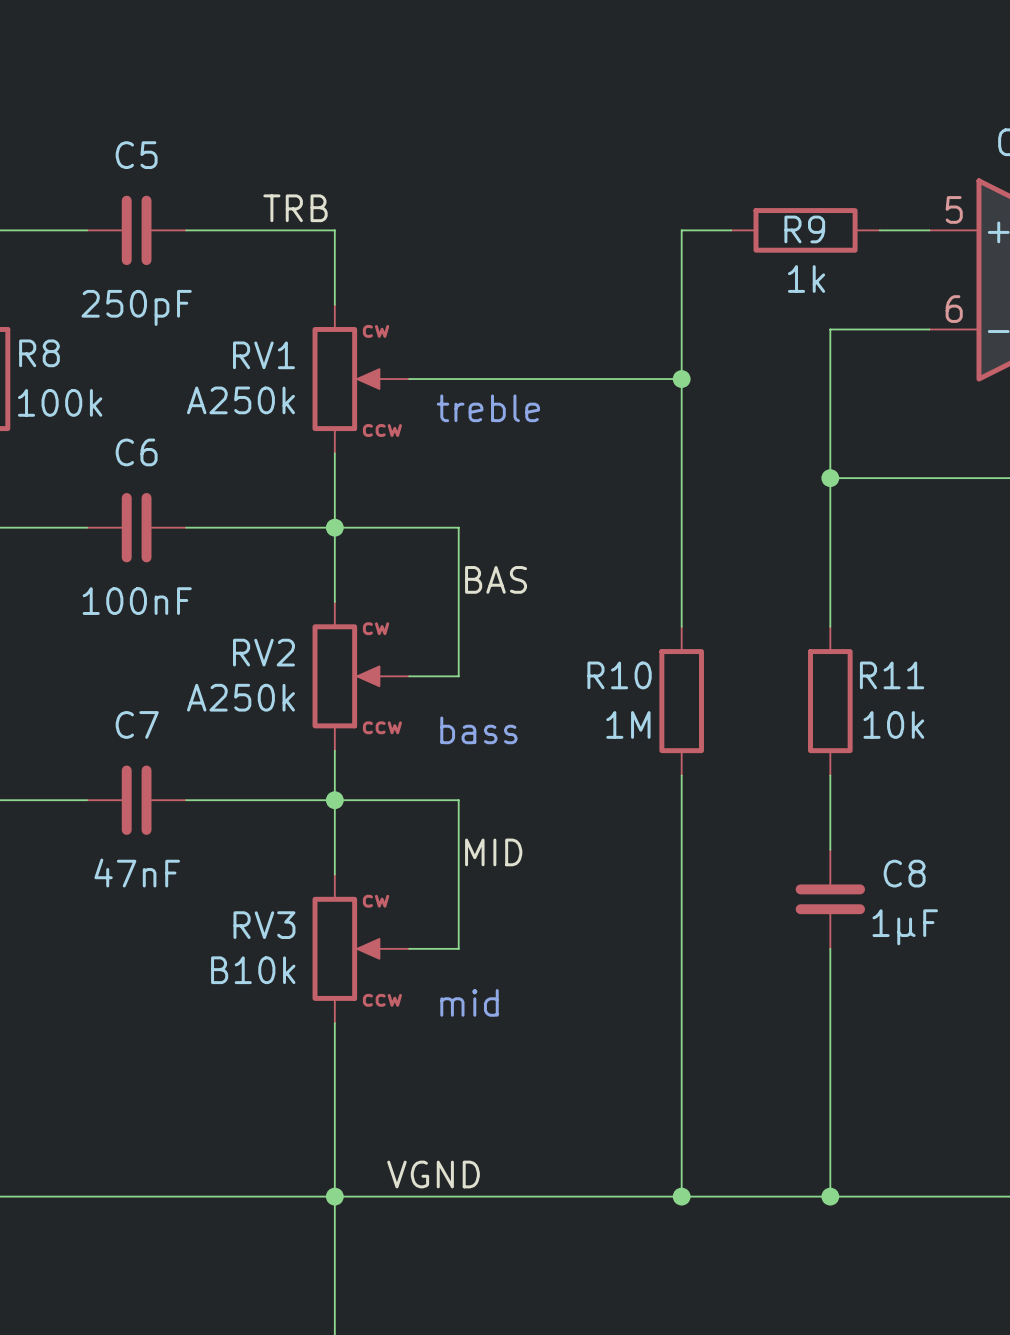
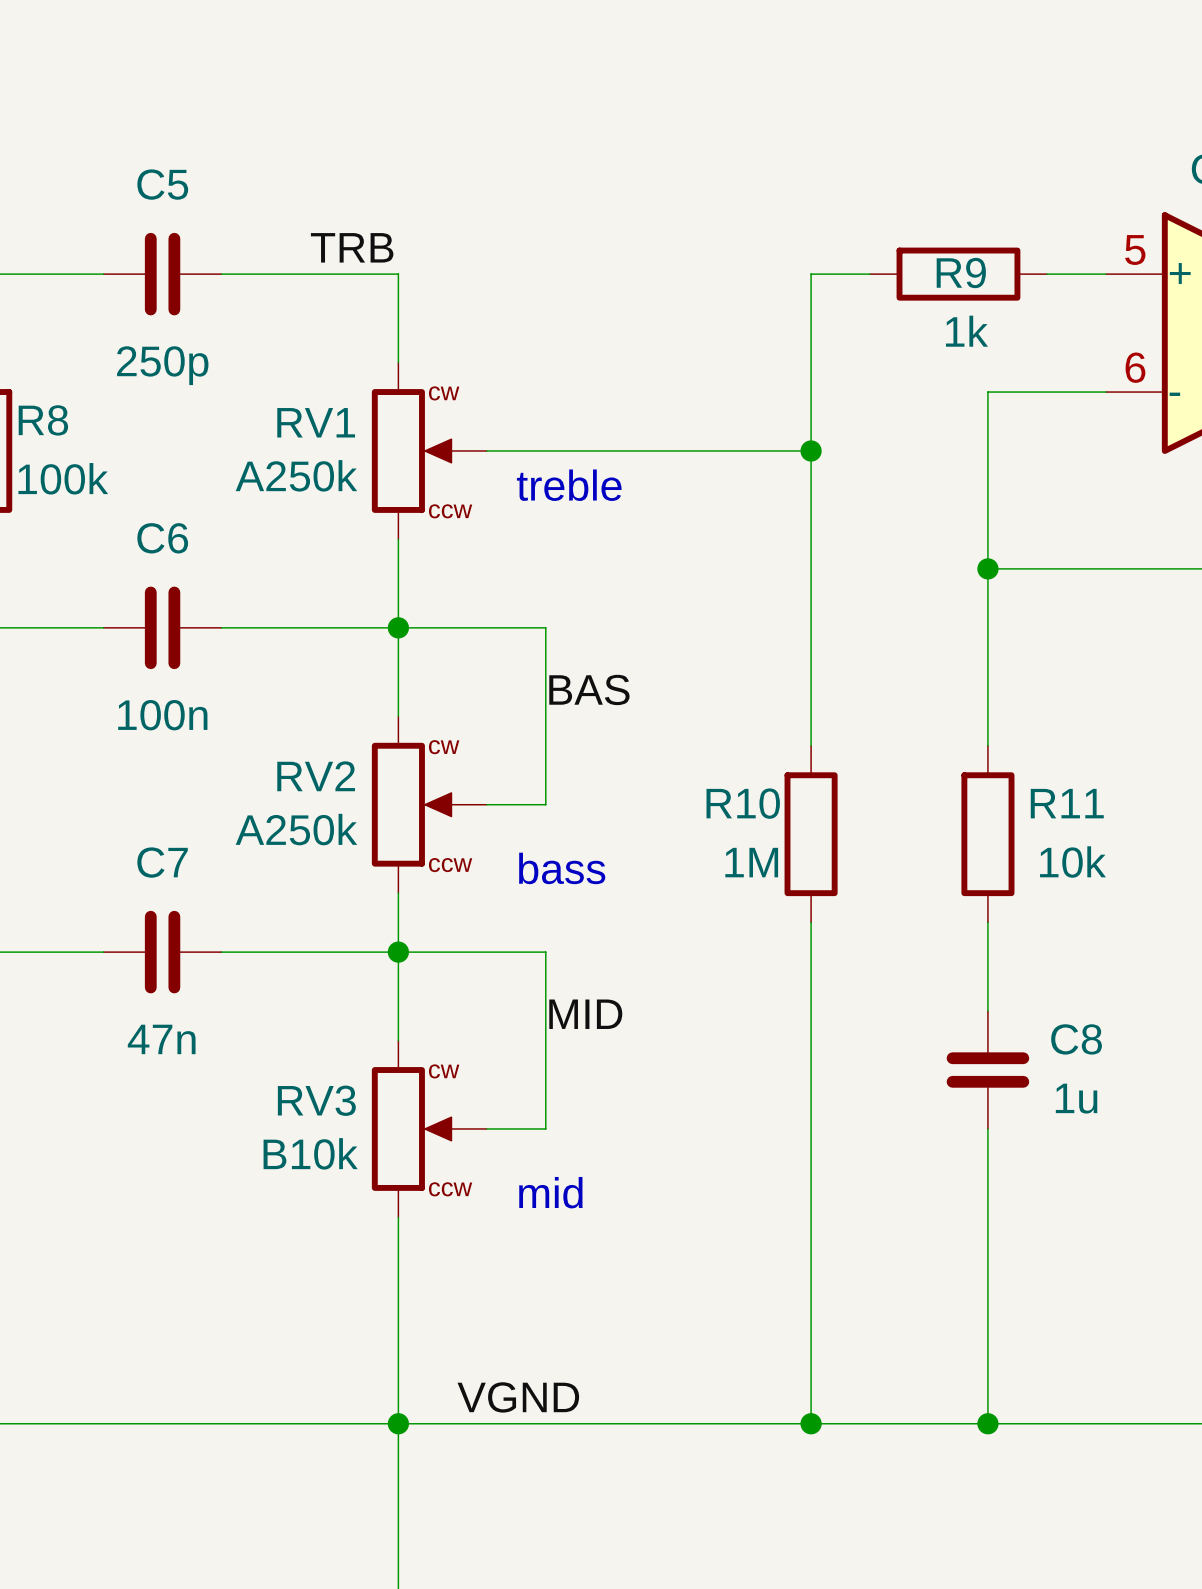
C5 value: 250pF (136, 307) -> 250p (162, 365)
C6 value: 100nF (137, 601) -> 100n (162, 715)
C7 value: 47nF (137, 873) -> 47n (161, 1039)
C8 value: 1µF (905, 927) -> 1u (1076, 1098)

